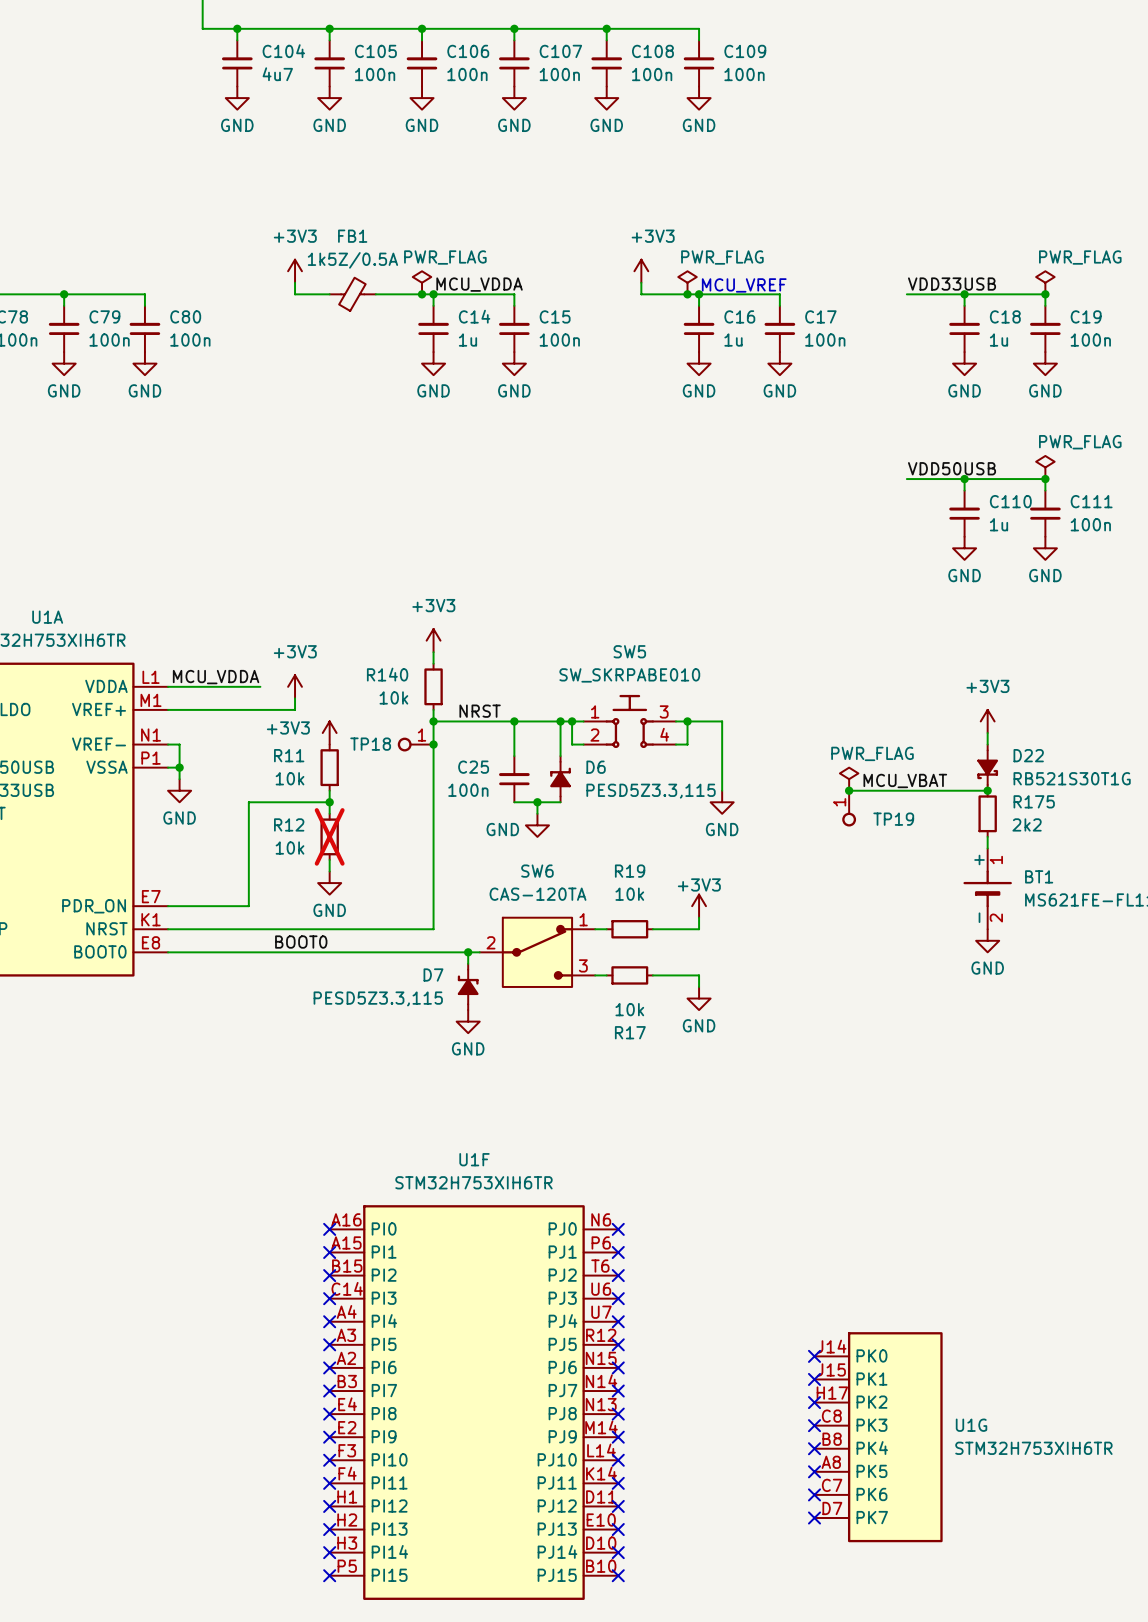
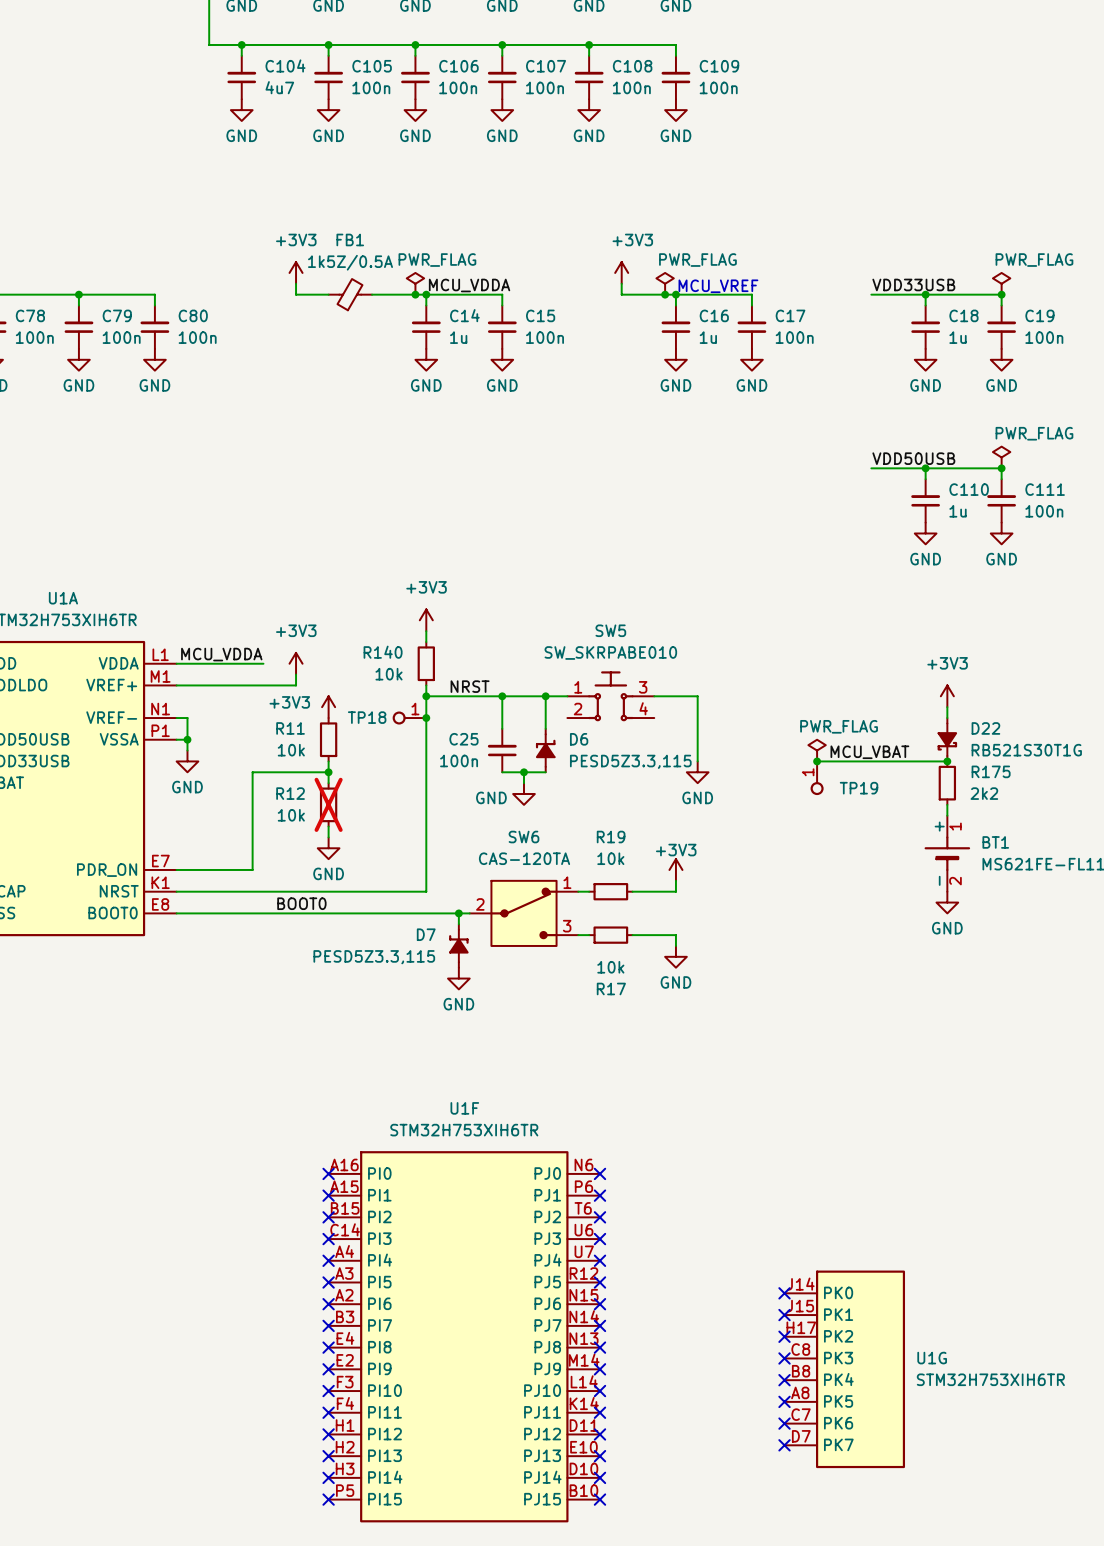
wire: (572, 721) (572, 744) (583, 744) -> none
junction: (572, 721) -> none
wire: (687, 721) (687, 744) (675, 744) -> none
junction: (687, 721) -> none

